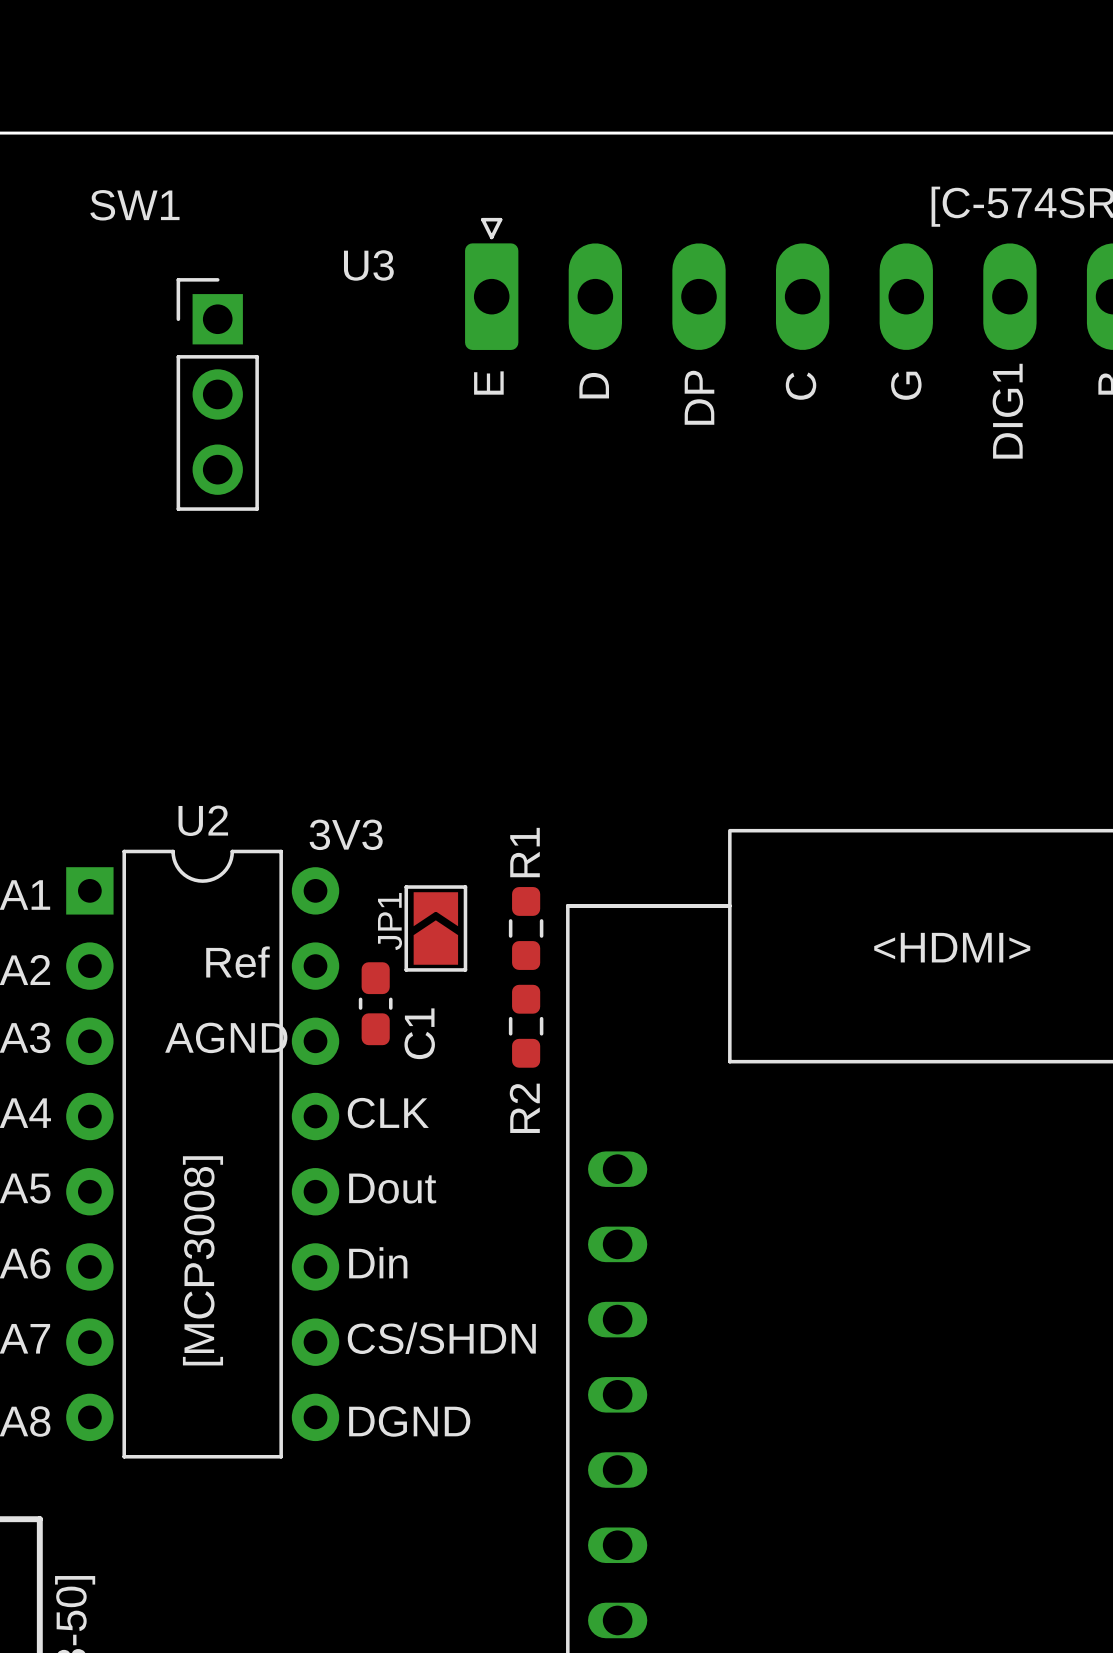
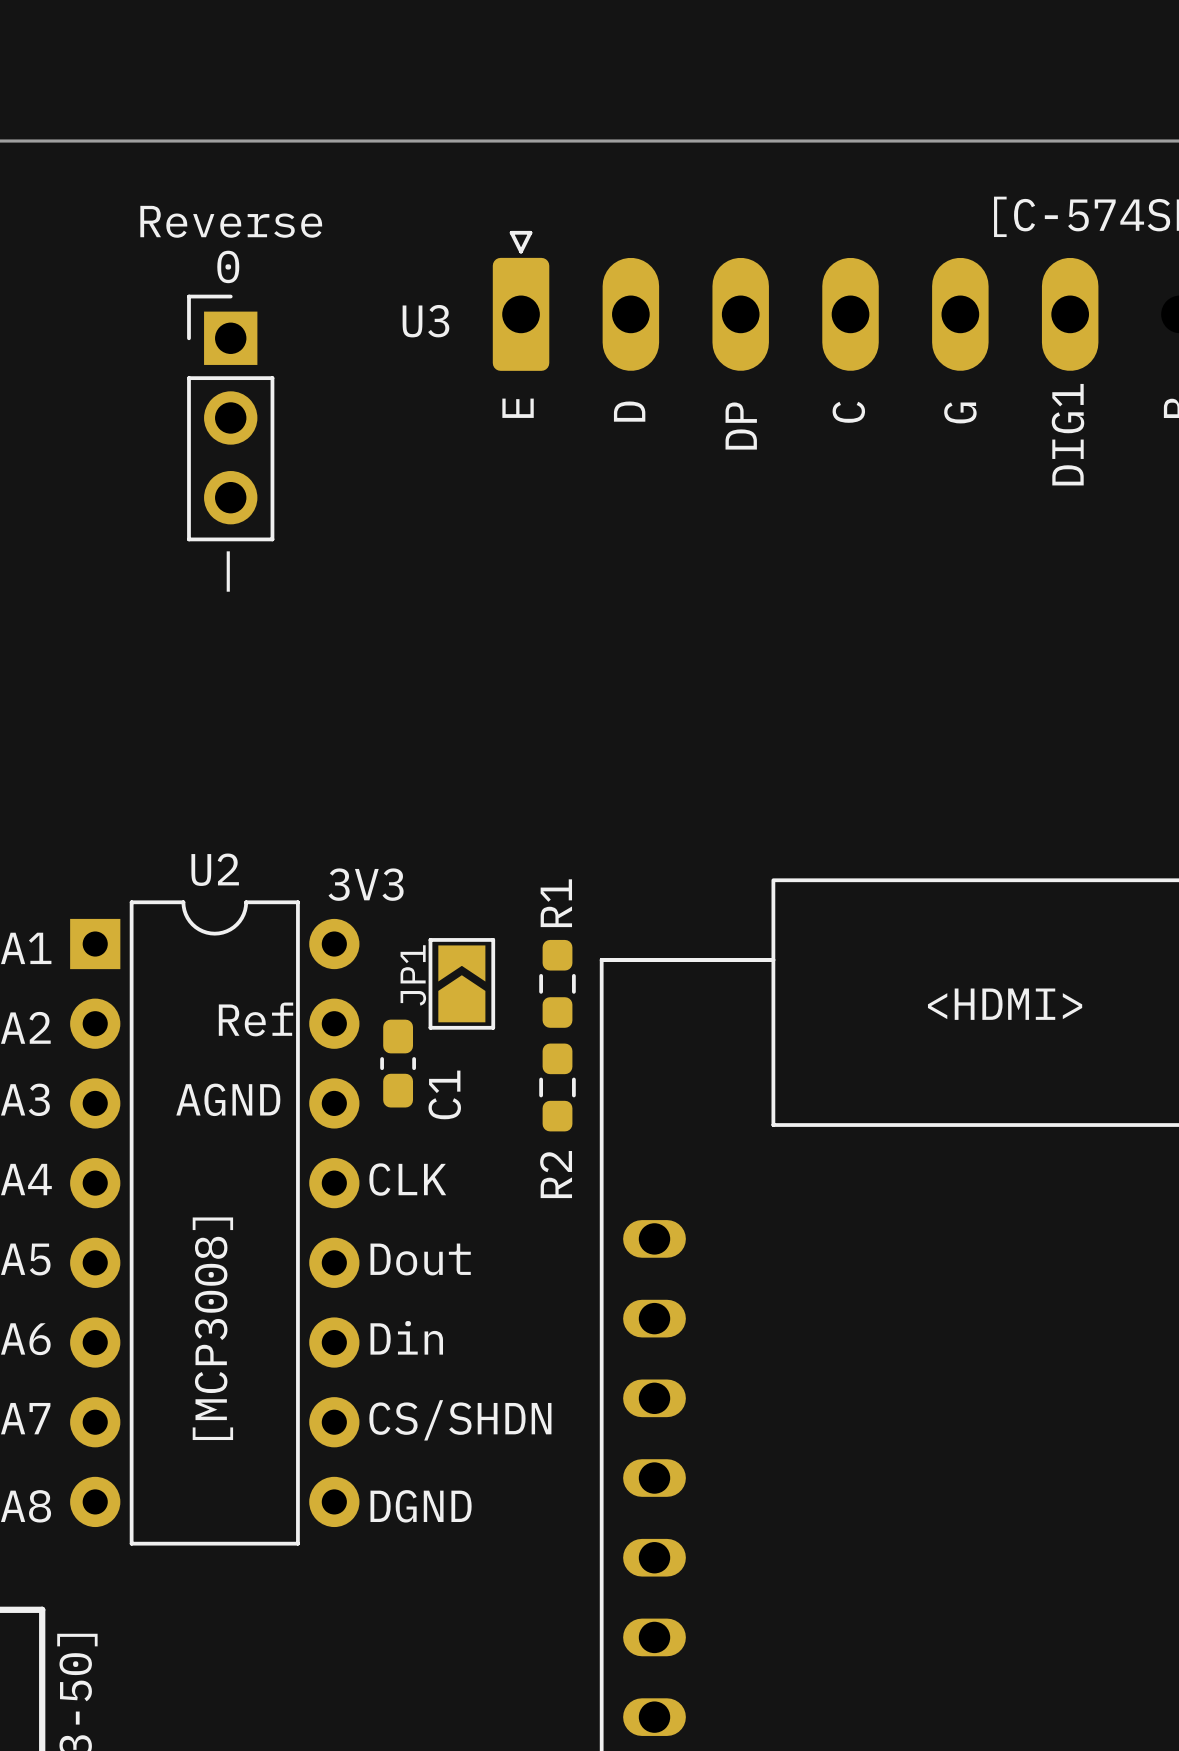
SW1 name: SW1 (134, 205) -> Reverse (231, 221)
text: none -> 0 (228, 266)
U3 name position: U3 (368, 265) -> U3 (425, 321)
text: none -> | (228, 571)

